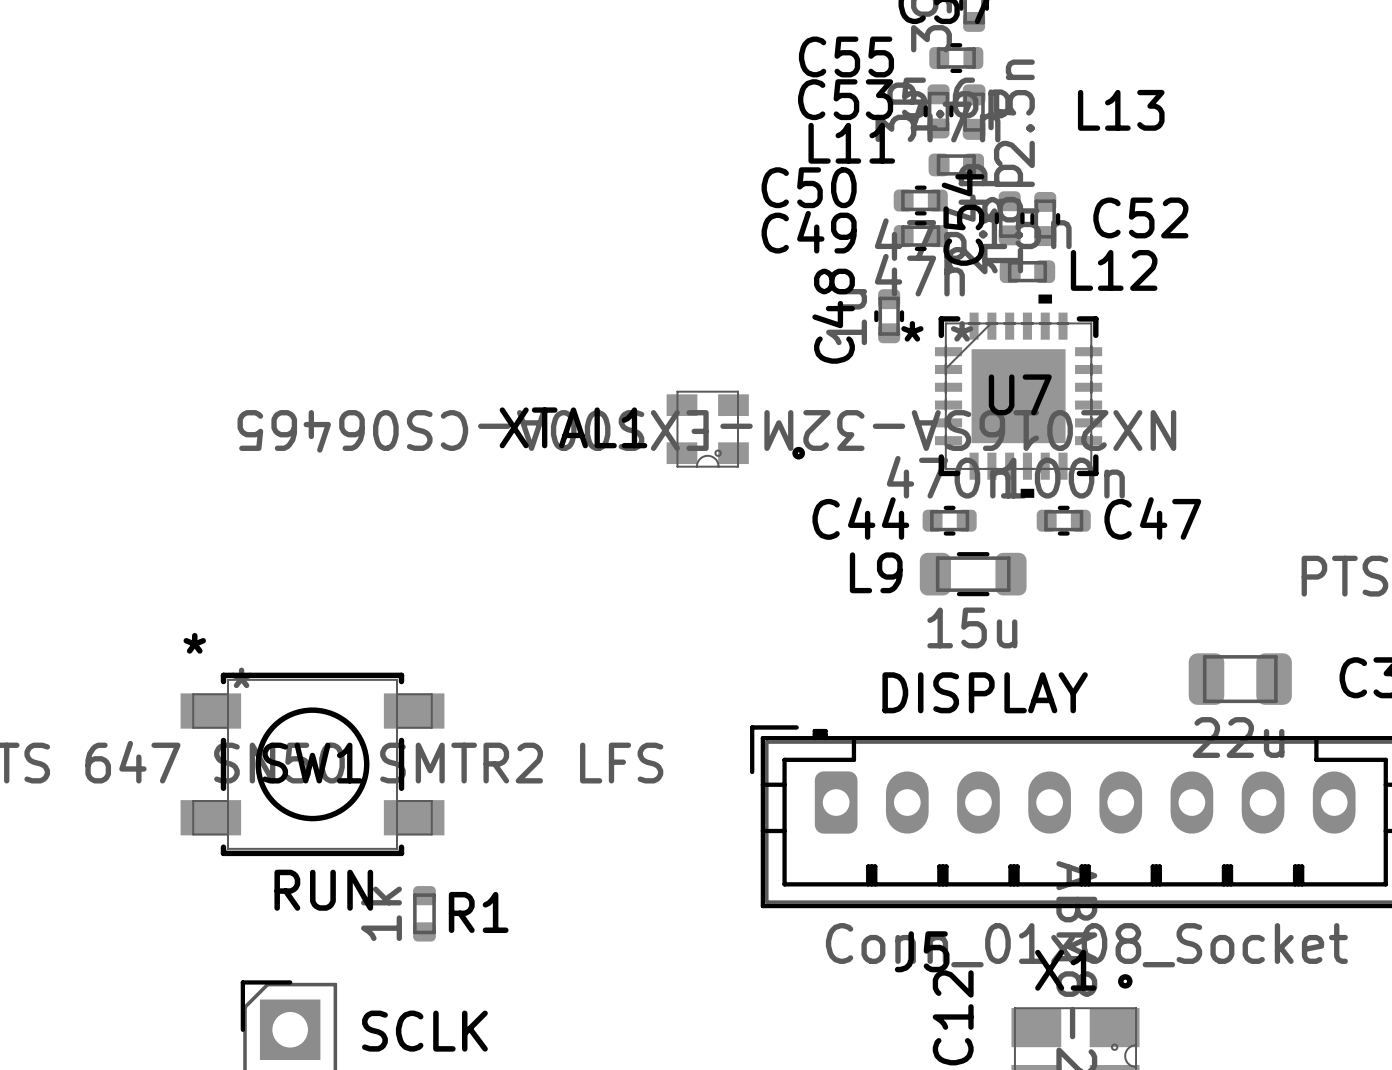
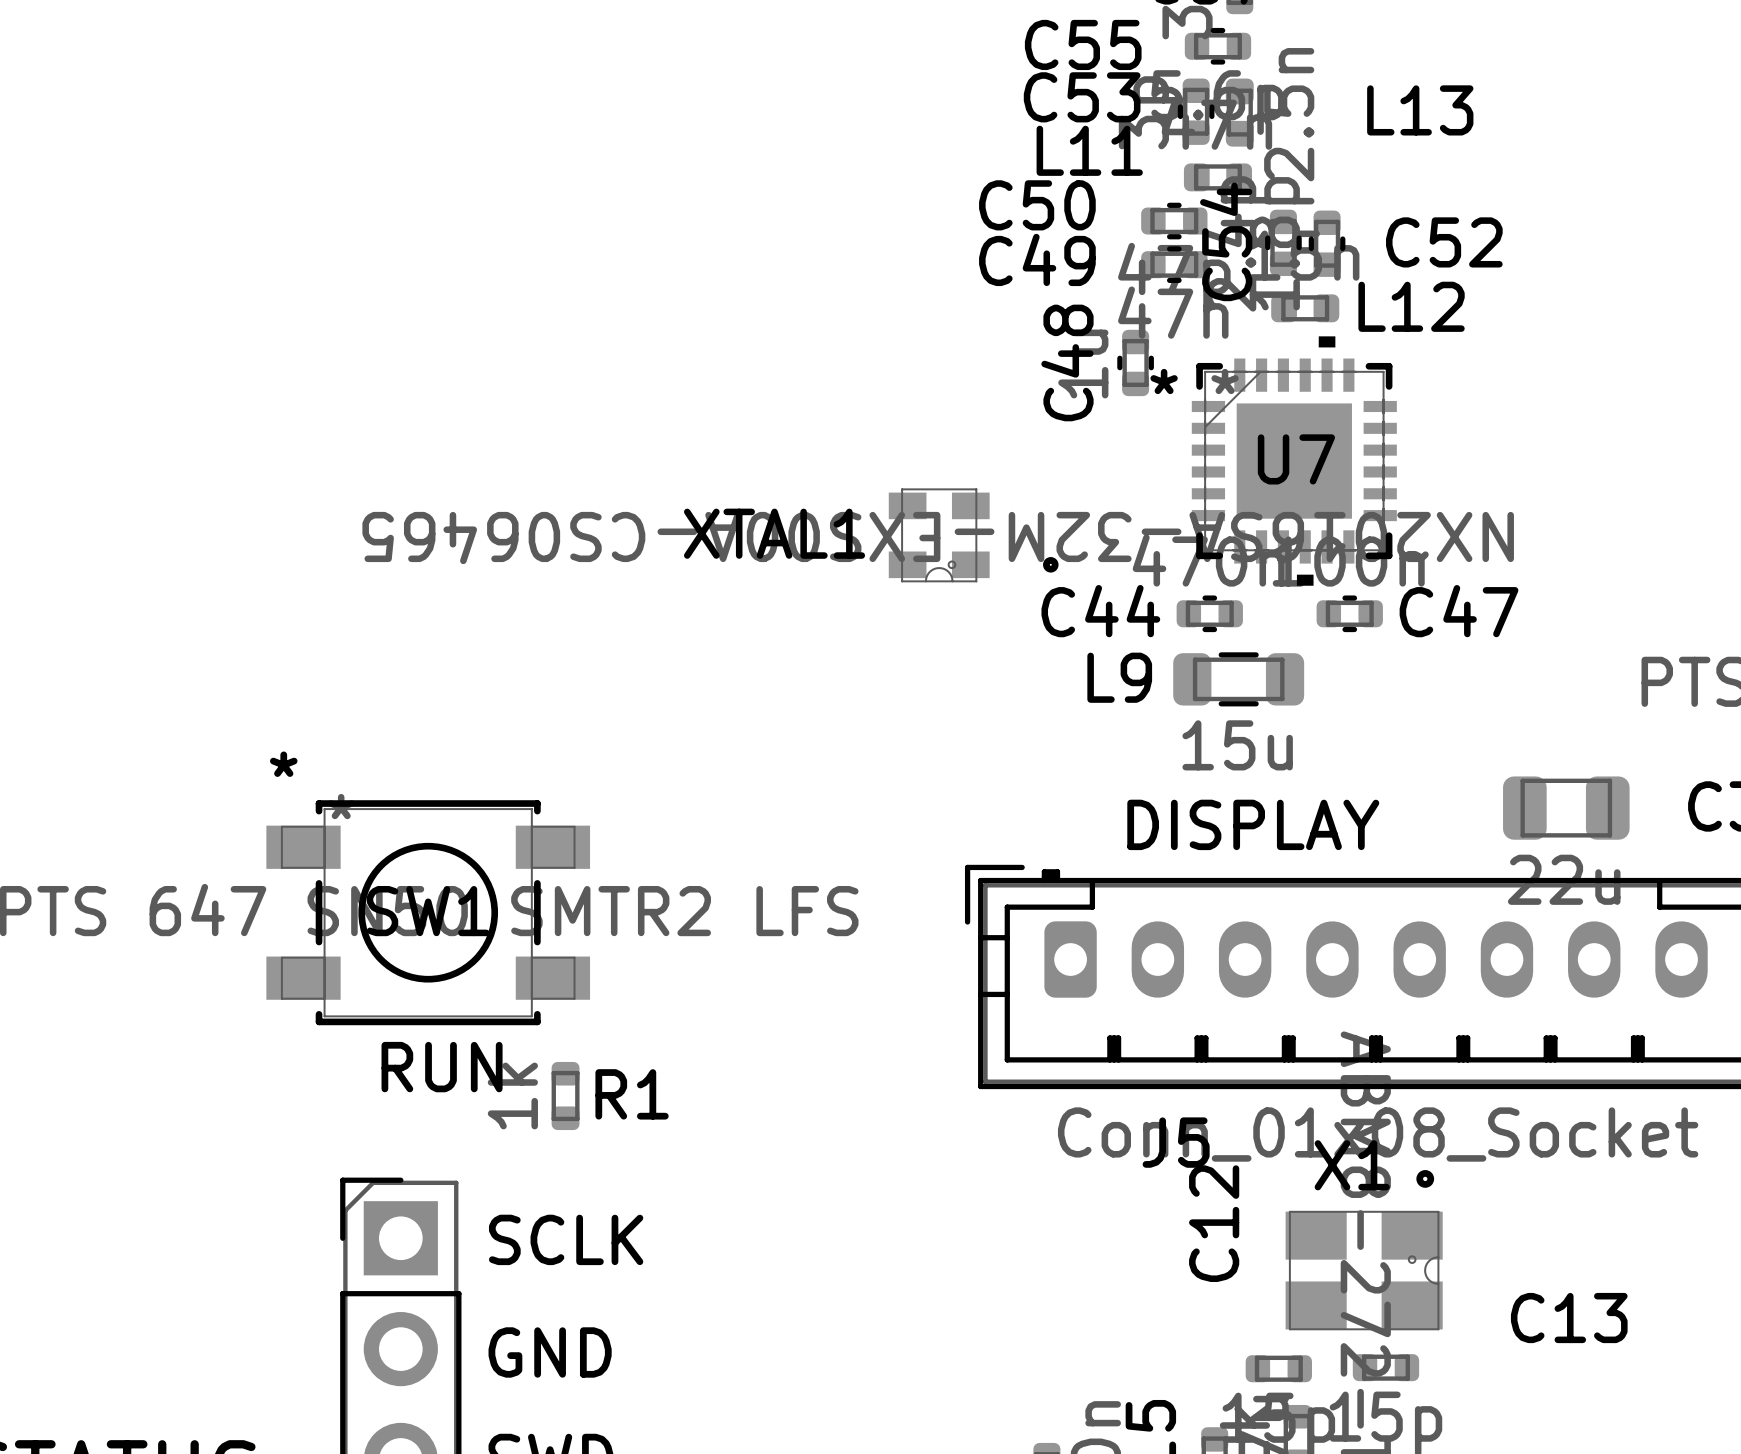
XTAL1 position: (735, 429) -> (973, 535)

